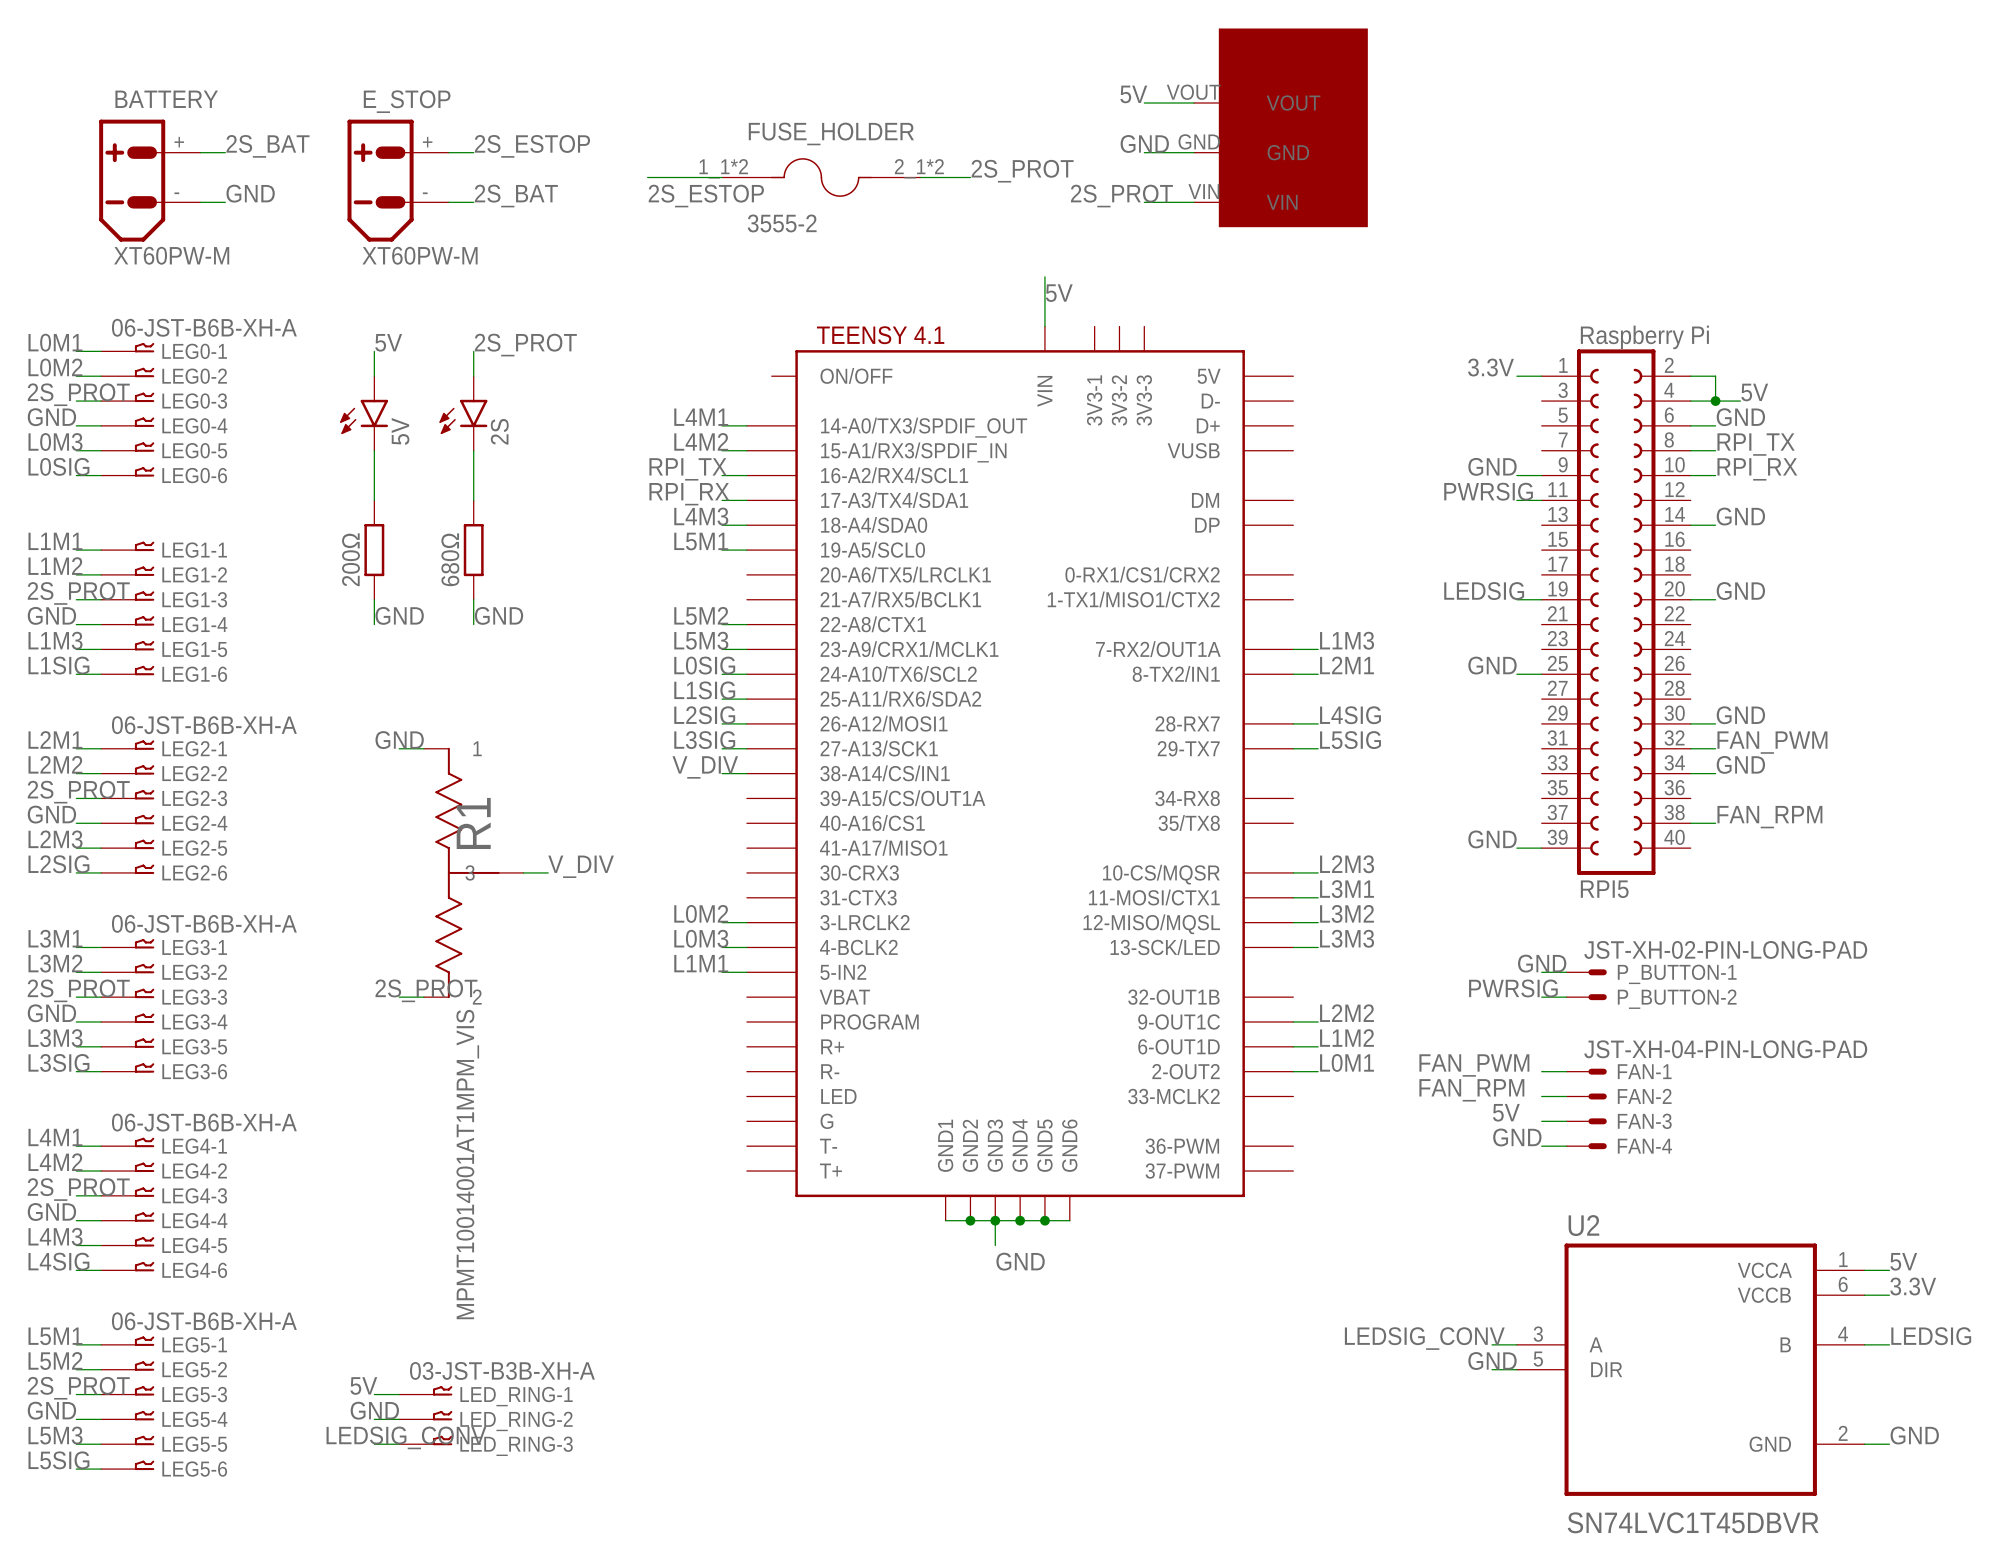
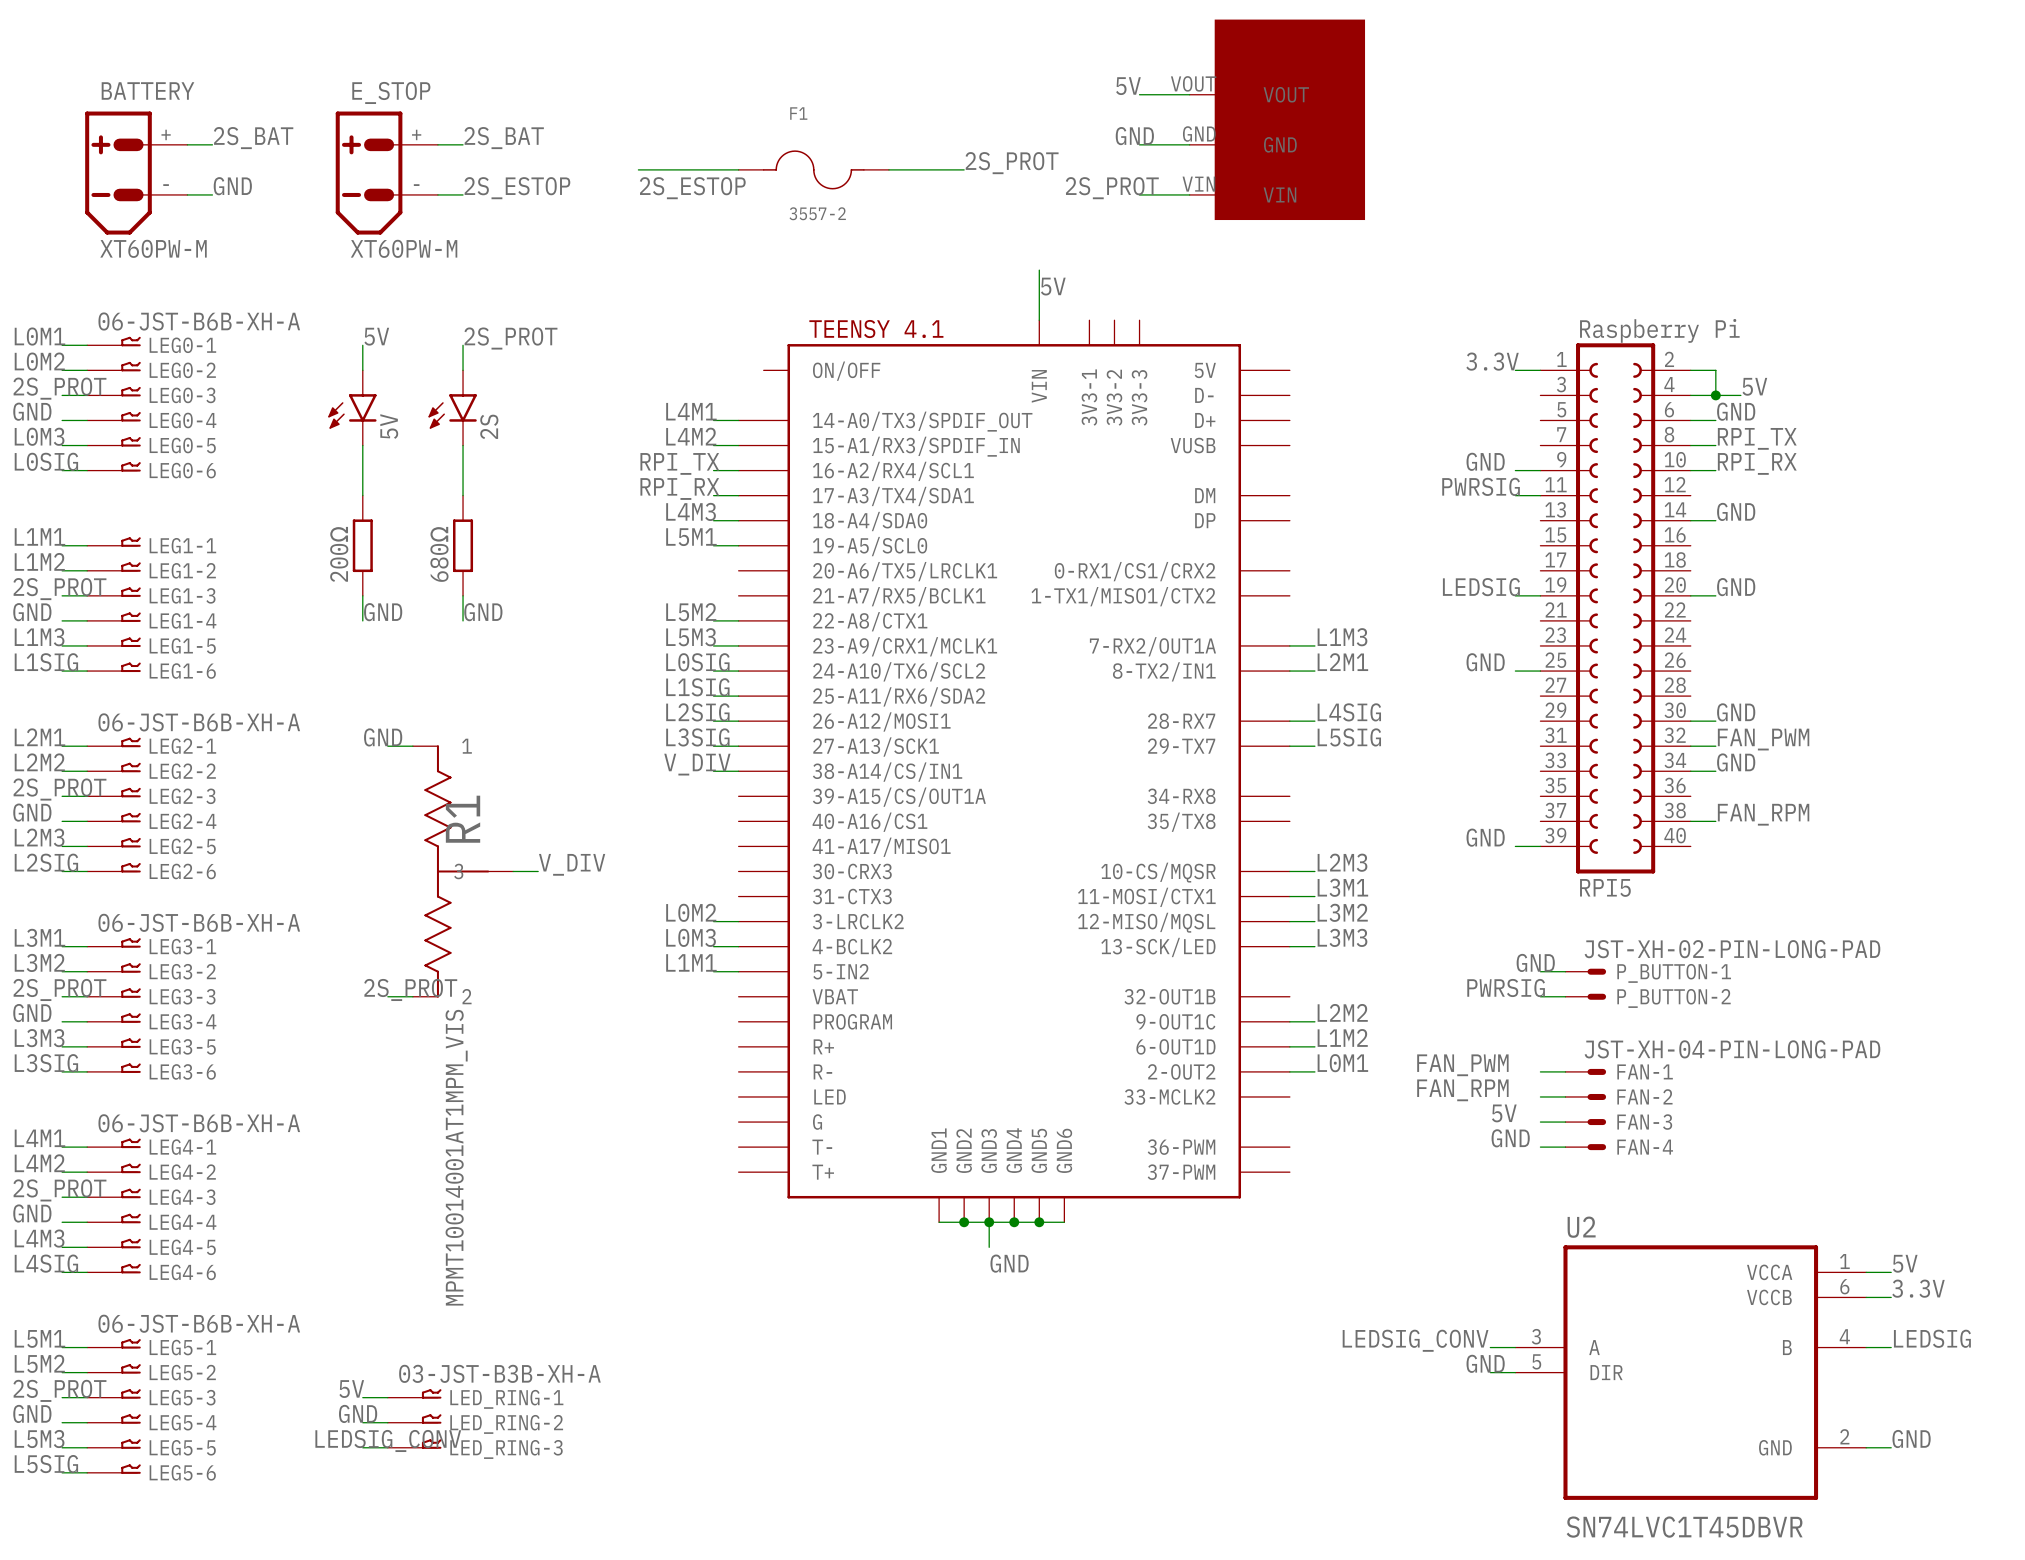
label: 2S_ESTOP (532, 146) -> 2S_BAT (504, 138)
FUSE_HOLDER: 3555-2 (821, 177) -> none
F1: none -> 3557-2 (813, 169)
label: 2S_BAT (516, 196) -> 2S_ESTOP (517, 188)

